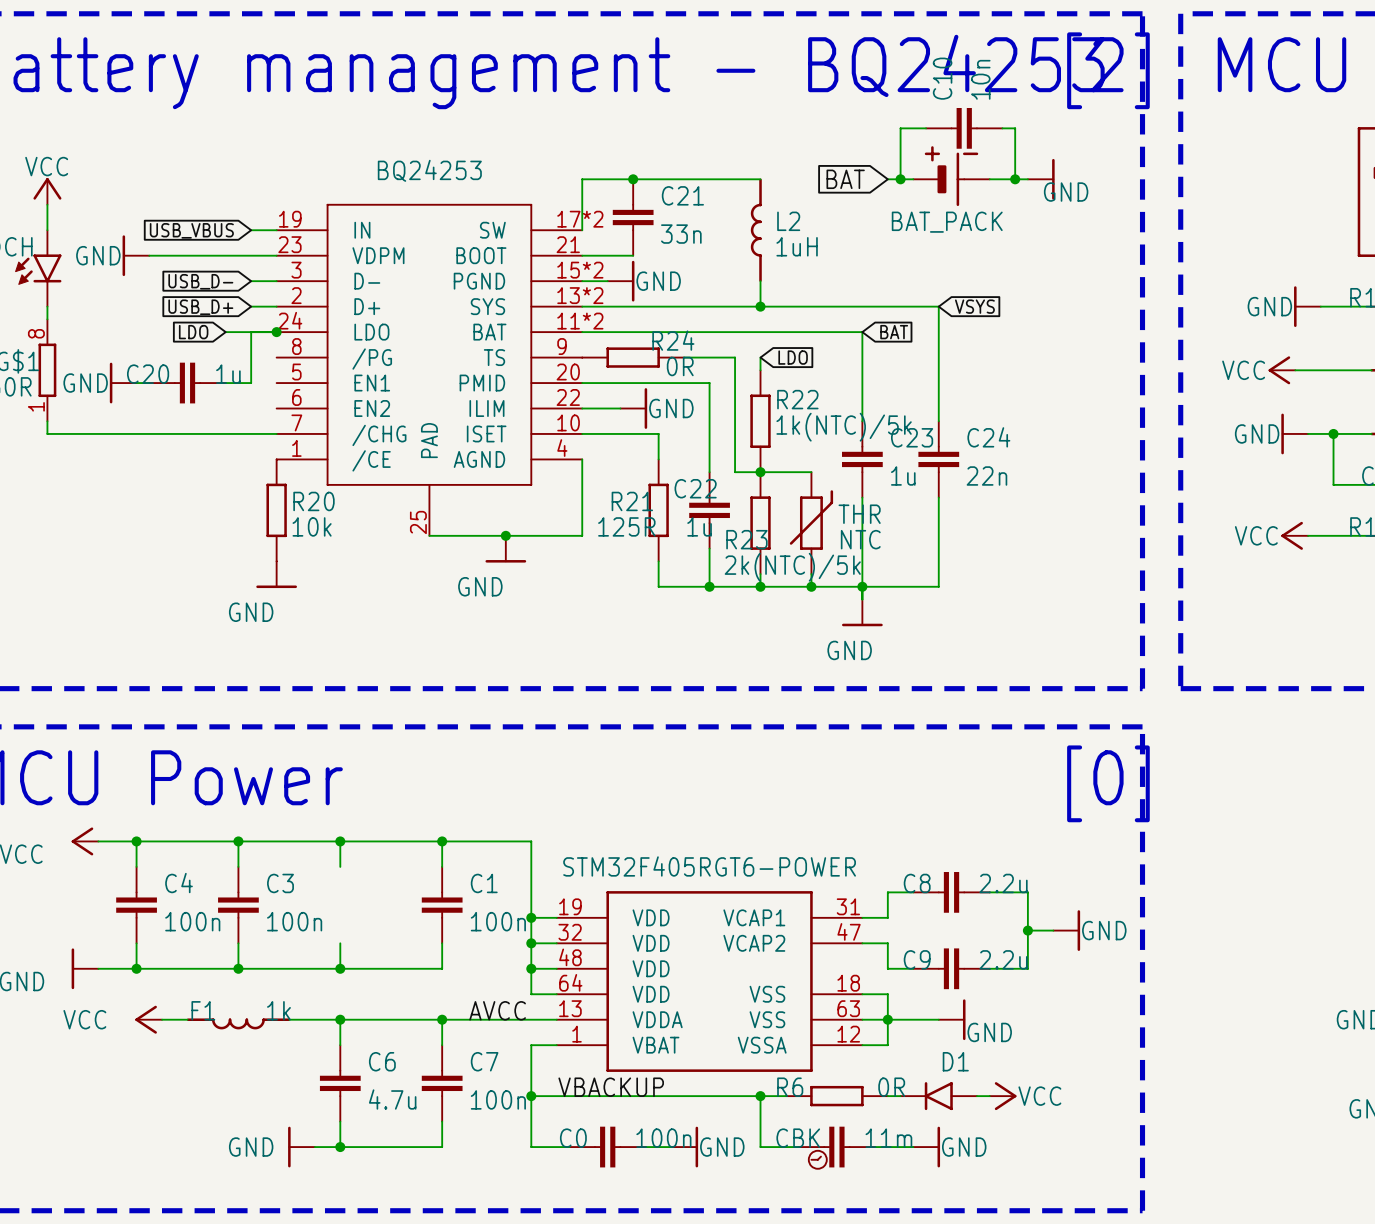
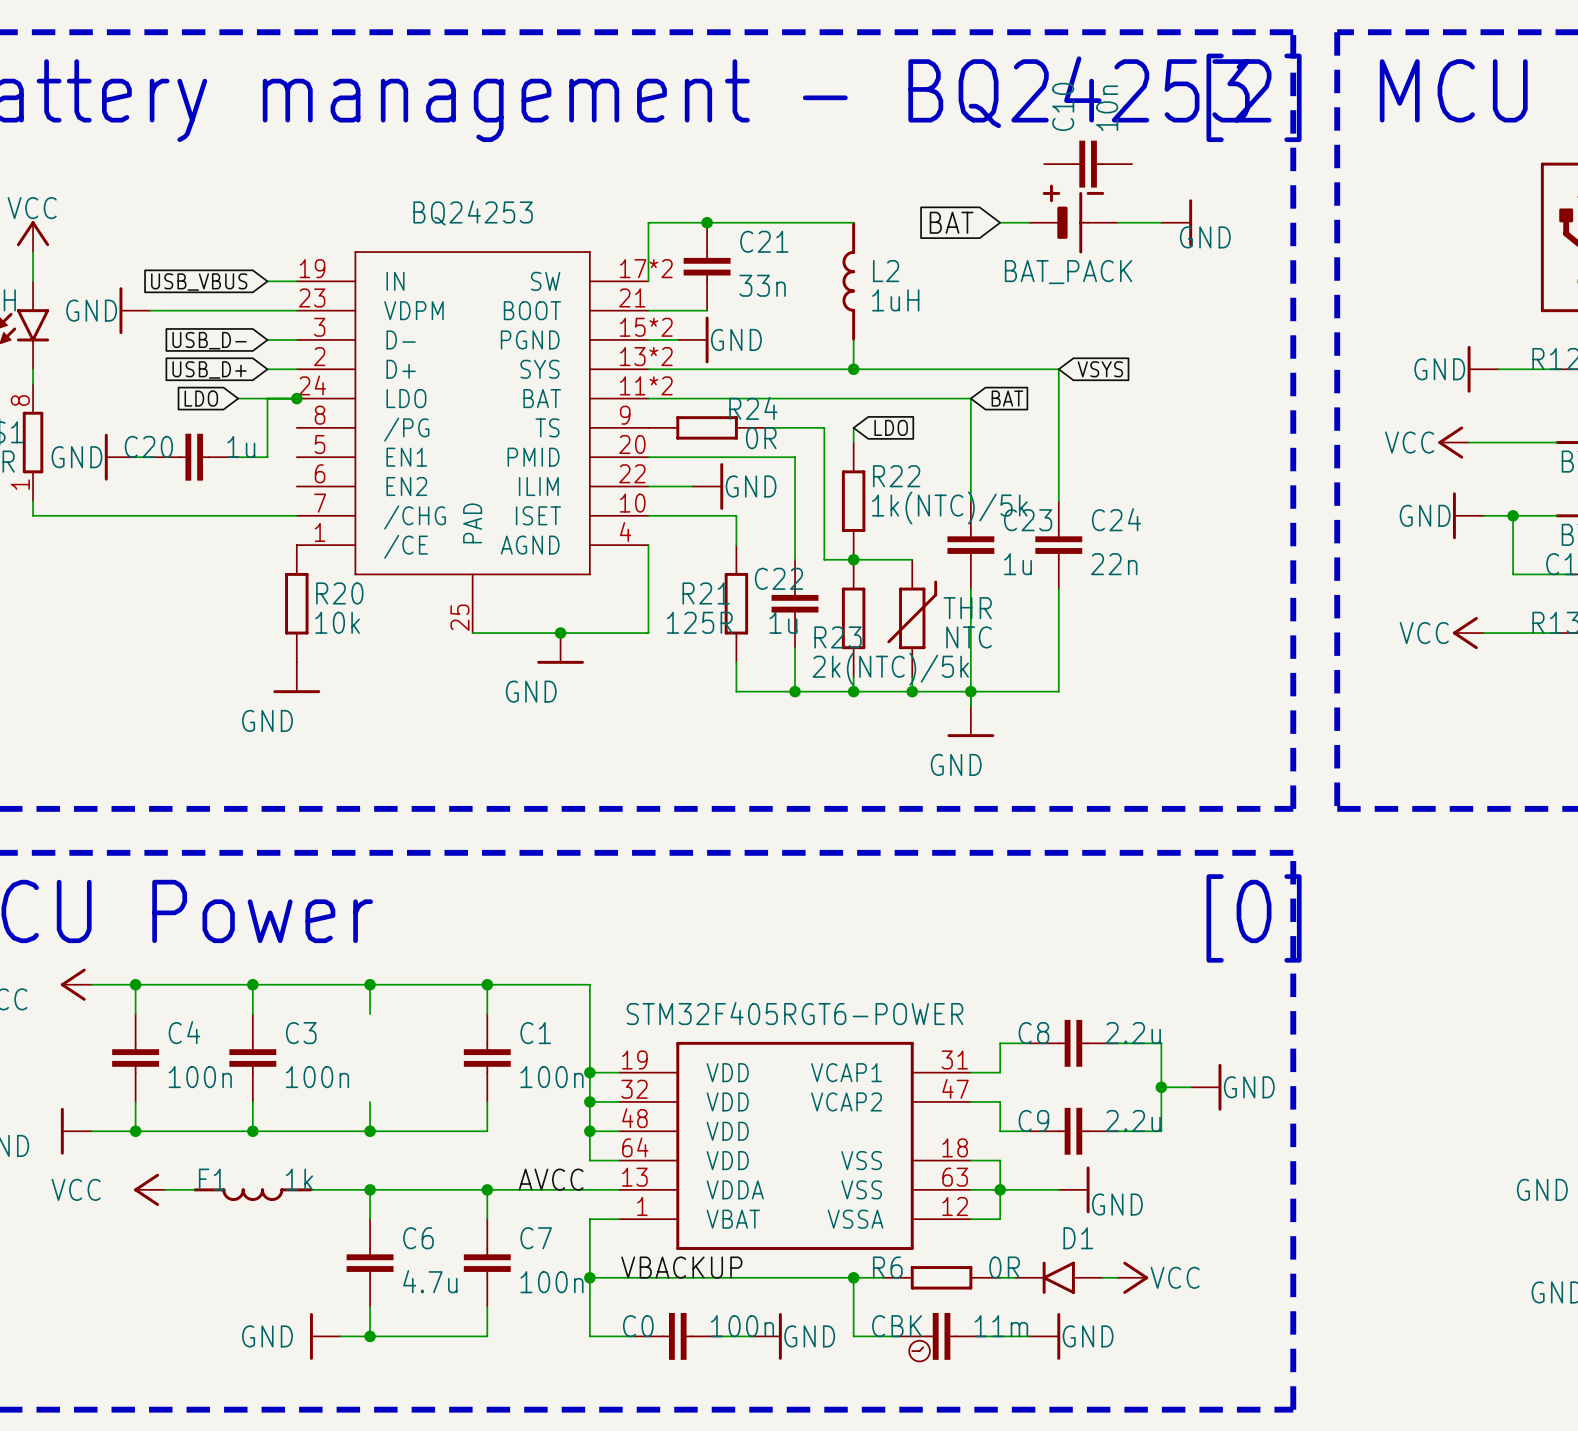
wire: (926, 128) (900, 128) (900, 179) -> none
wire: (1002, 128) (1015, 128) (1015, 179) -> none
junction: (900, 179) -> none
junction: (1015, 179) -> none

